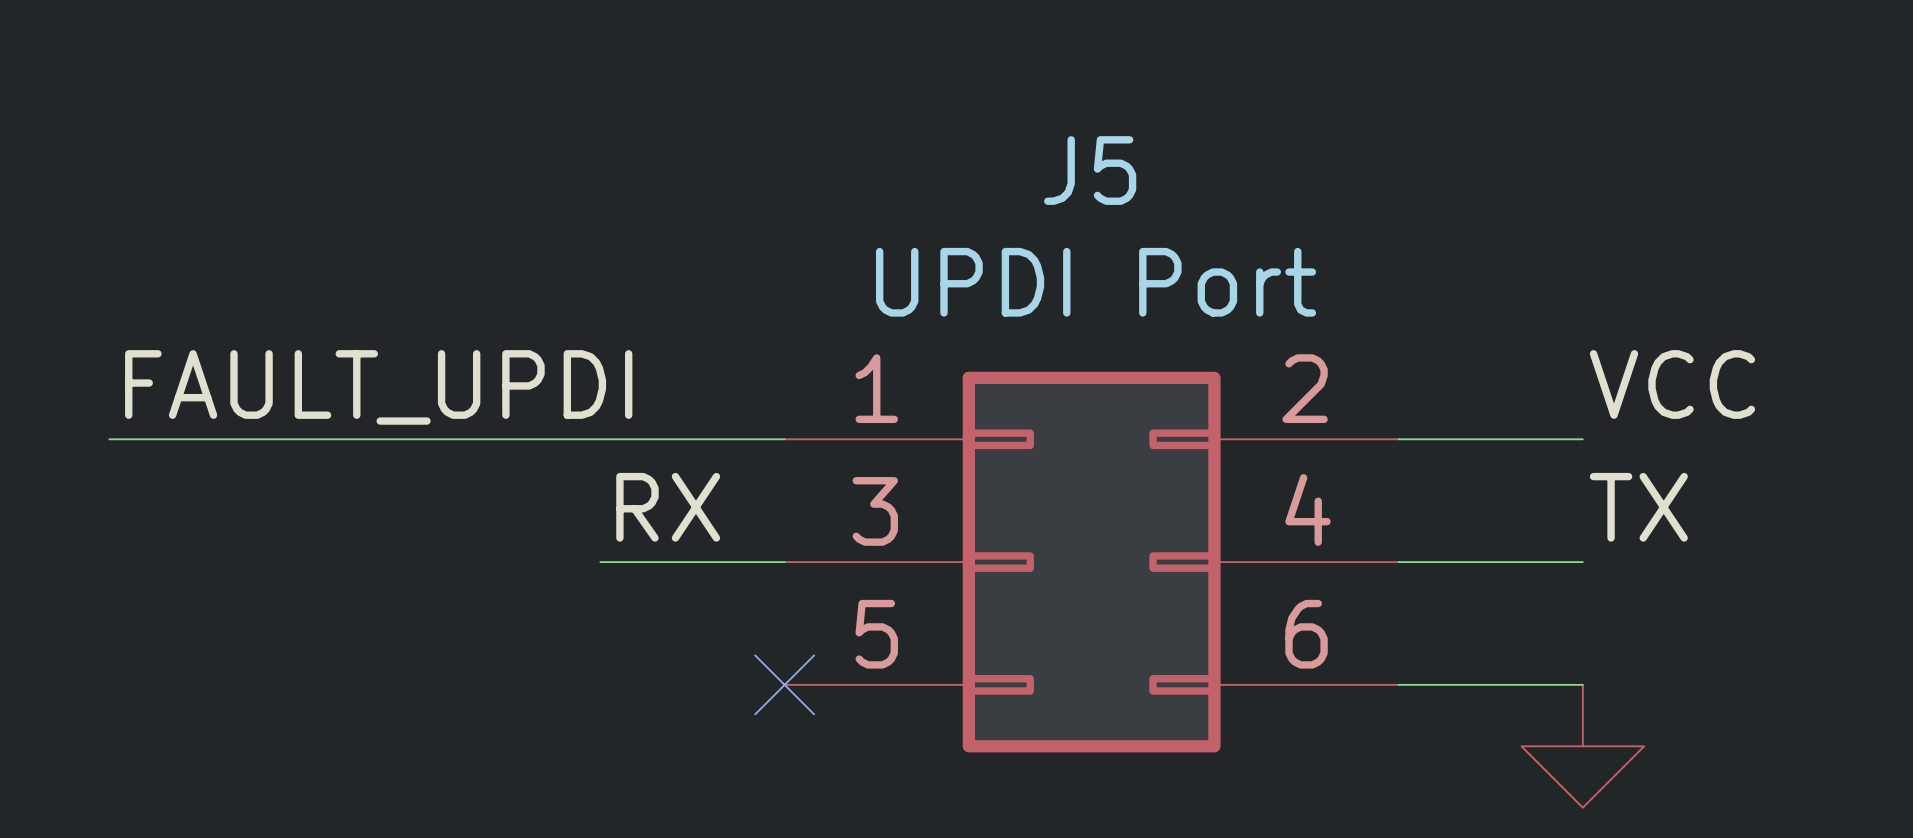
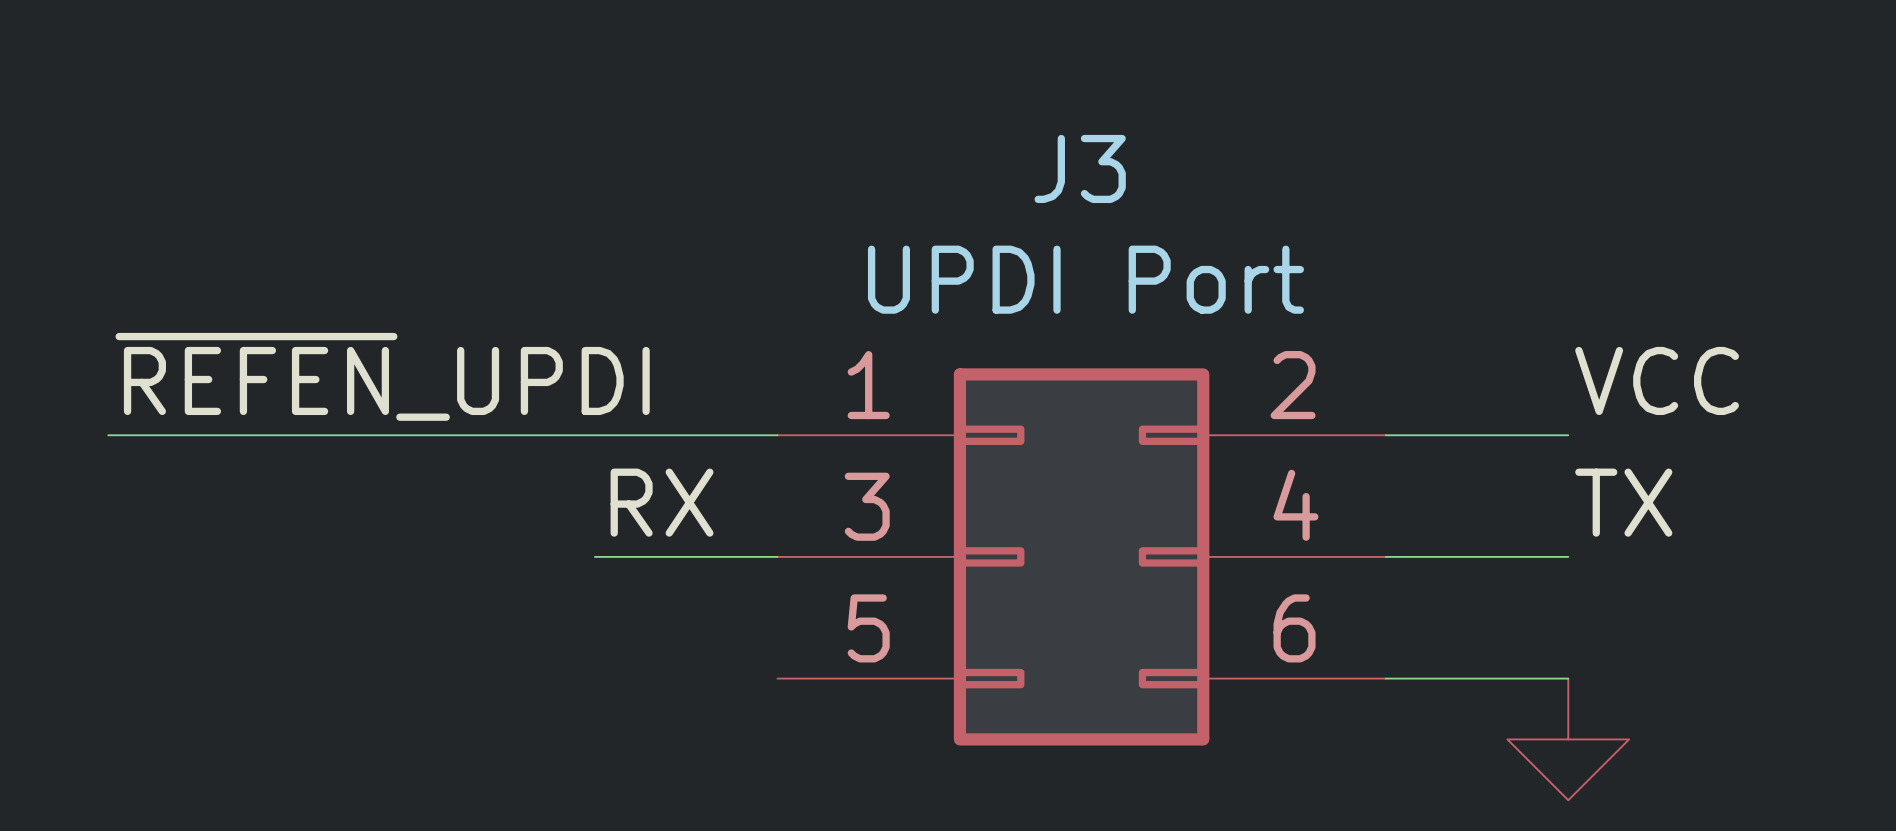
J5 name: J5 (1090, 170) -> J3 (1080, 168)
label: FAULT_UPDI (378, 387) -> ~{REFEN}_UPDI (382, 376)
no-connect mark: (784, 684) -> none

